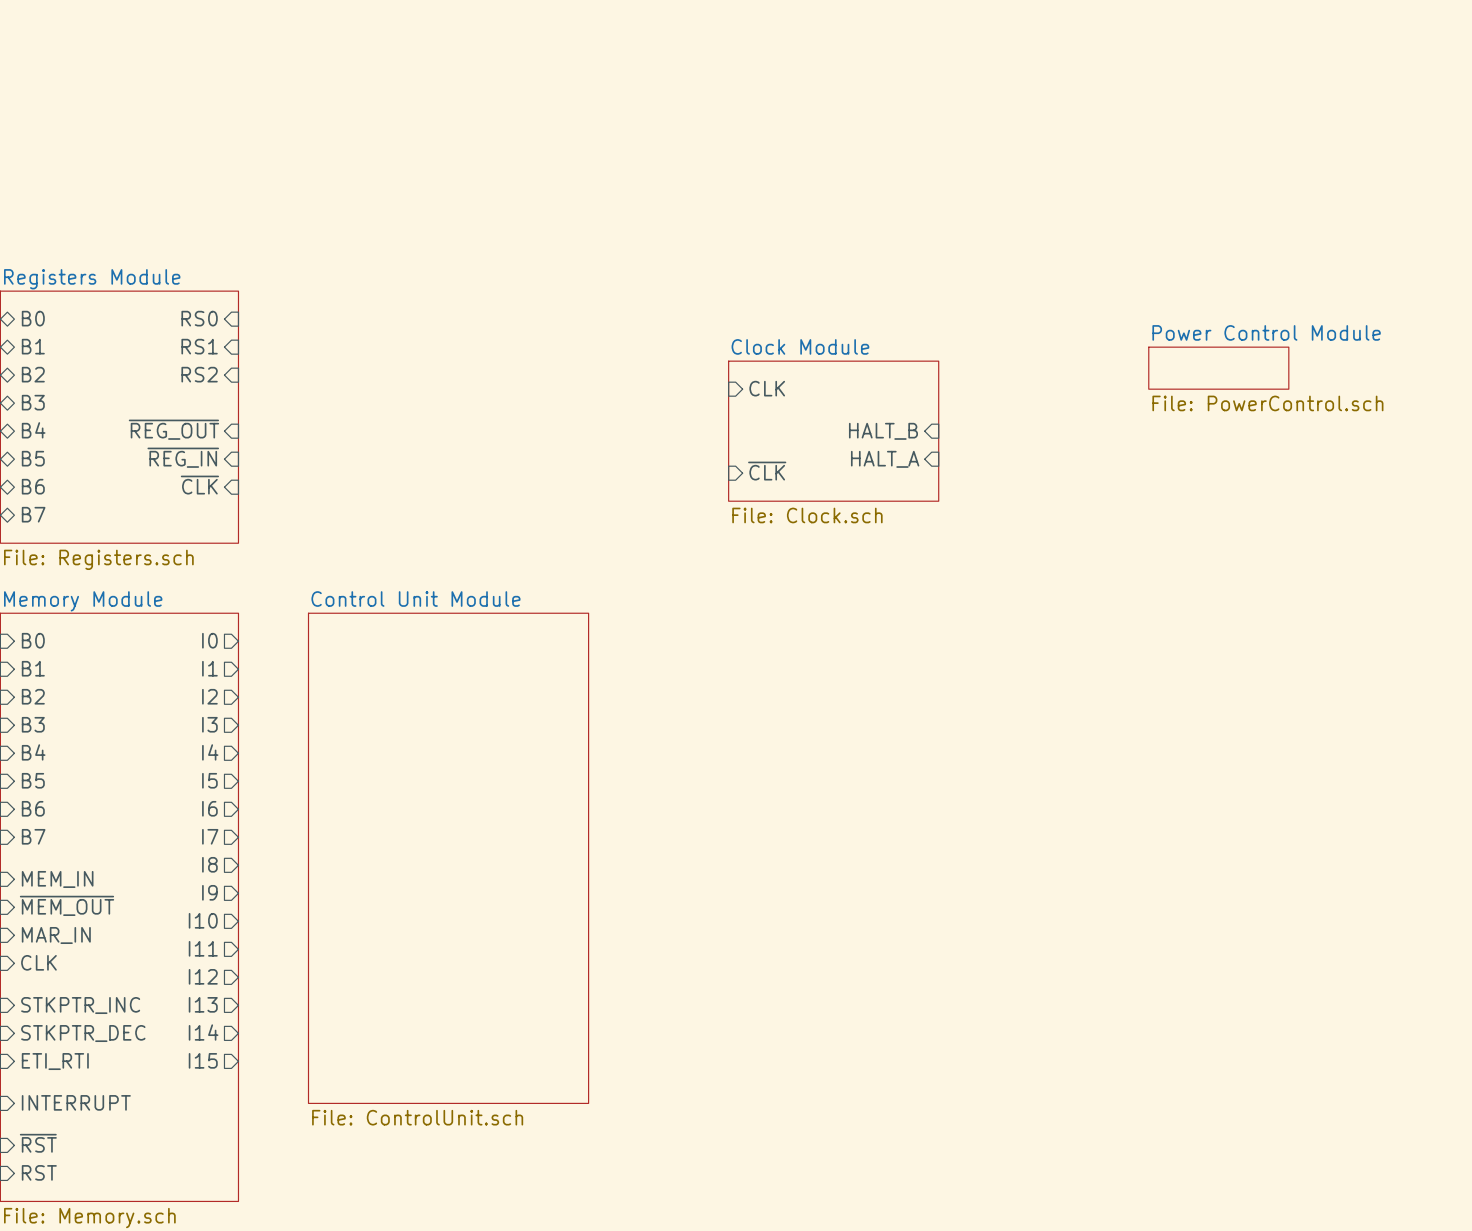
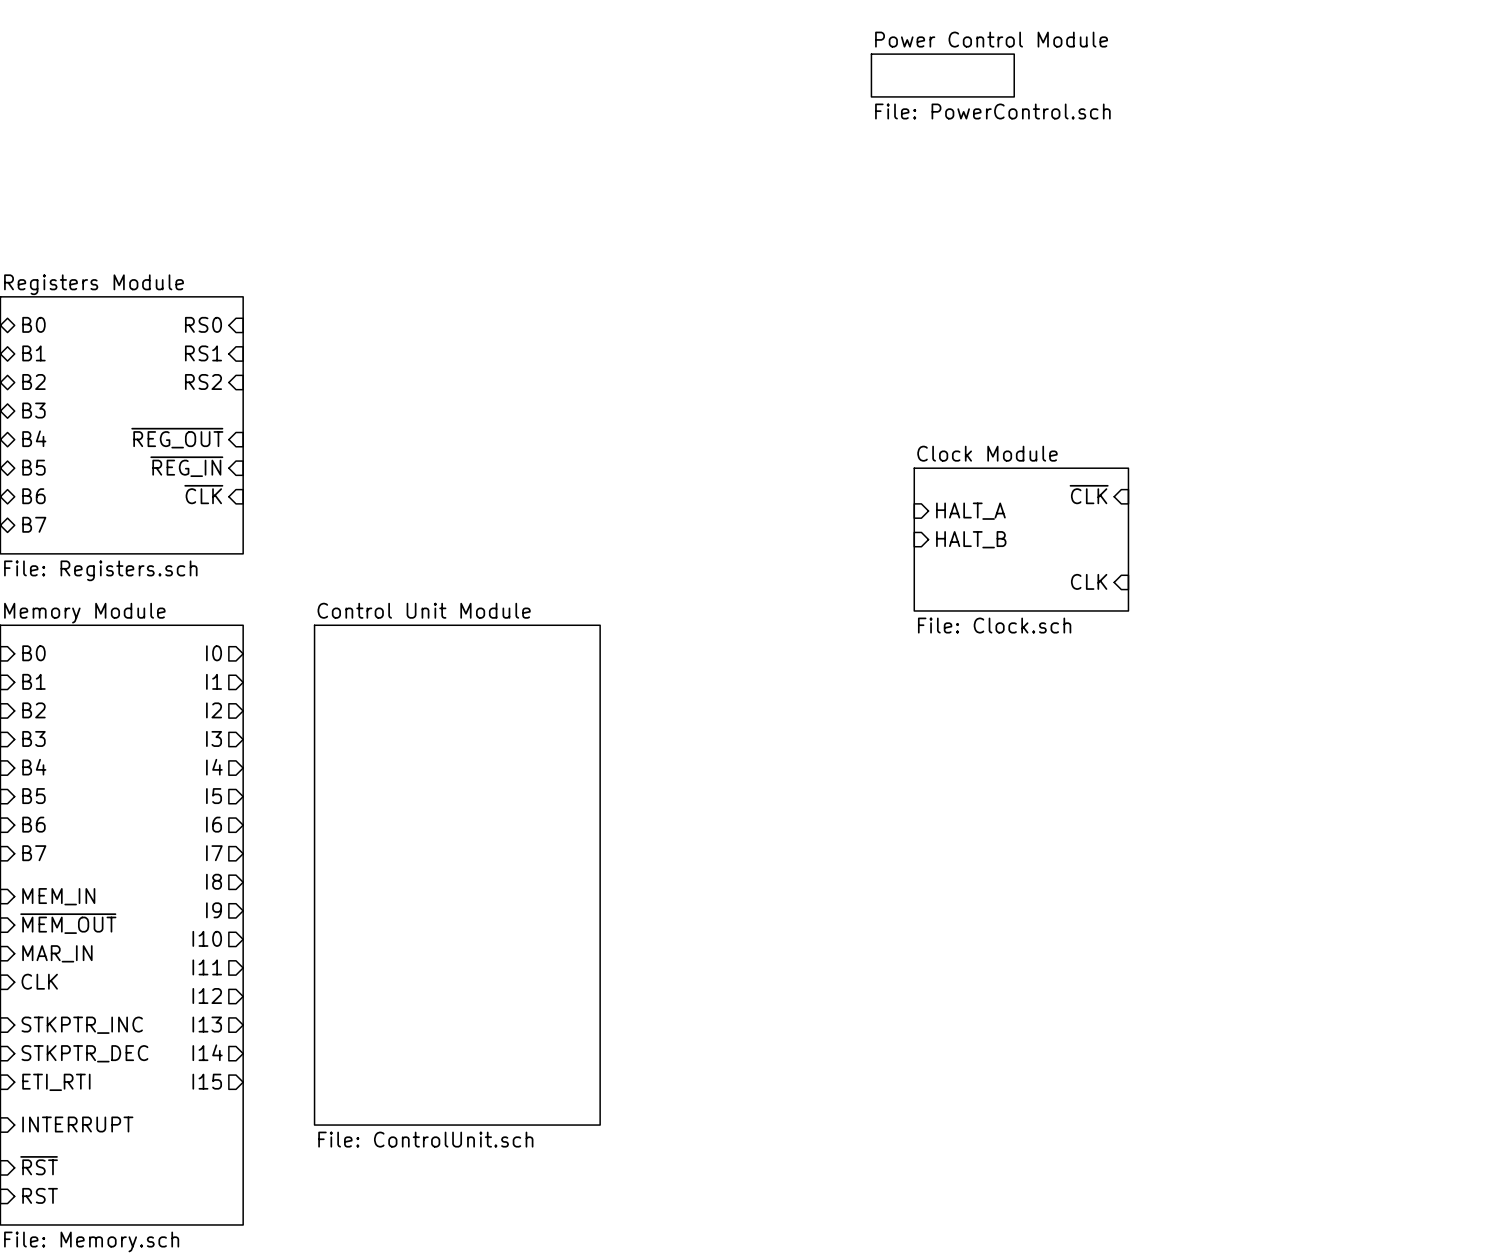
sheet Power Control Module: none -> File: PowerControl.sch (942, 75)
sheet Power Control Module: File: PowerControl.sch (1218, 368) -> none
sheet pin: CLK (767, 388) -> none
sheet Clock Module position: (833, 431) -> (1021, 539)
sheet pin rotation: 0° (883, 431) -> 180° (971, 539)
sheet pin position: HALT_B (883, 431) -> HALT_B (971, 539)
sheet pin rotation: 0° (885, 459) -> 180° (970, 511)
sheet pin position: HALT_A (885, 459) -> HALT_A (970, 511)
sheet pin: ~{CLK} (767, 471) -> none
sheet pin: none -> ~{CLK} (1089, 494)
sheet pin: none -> CLK (1089, 581)

